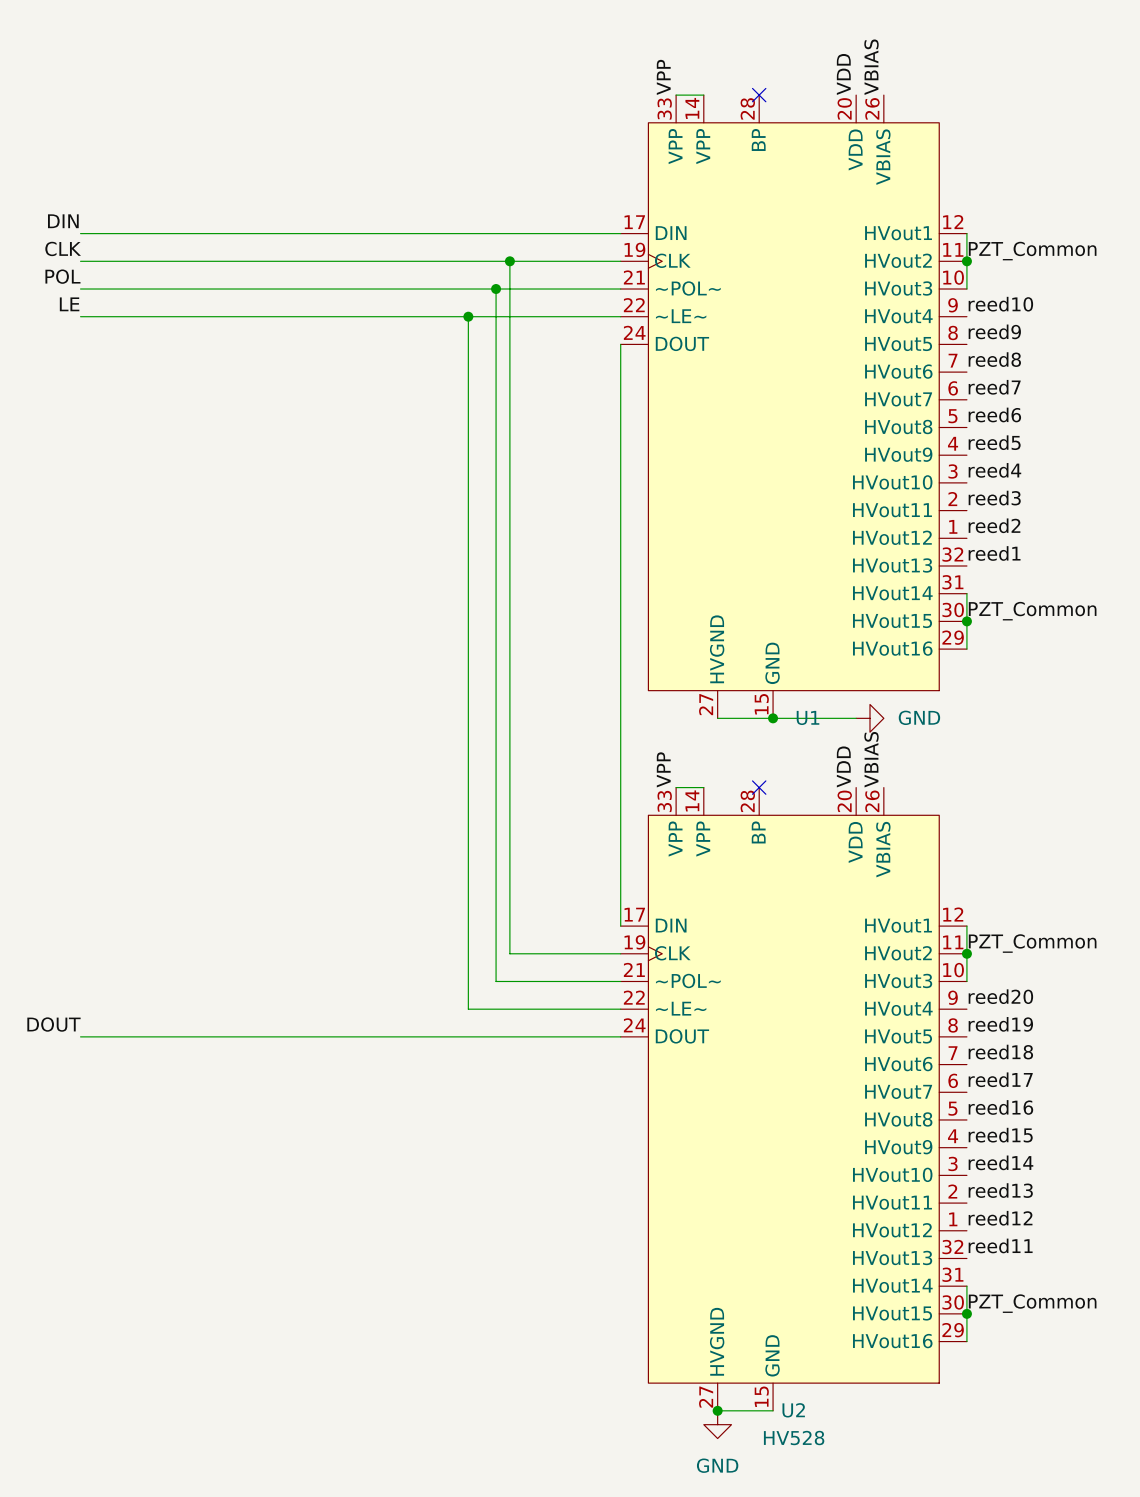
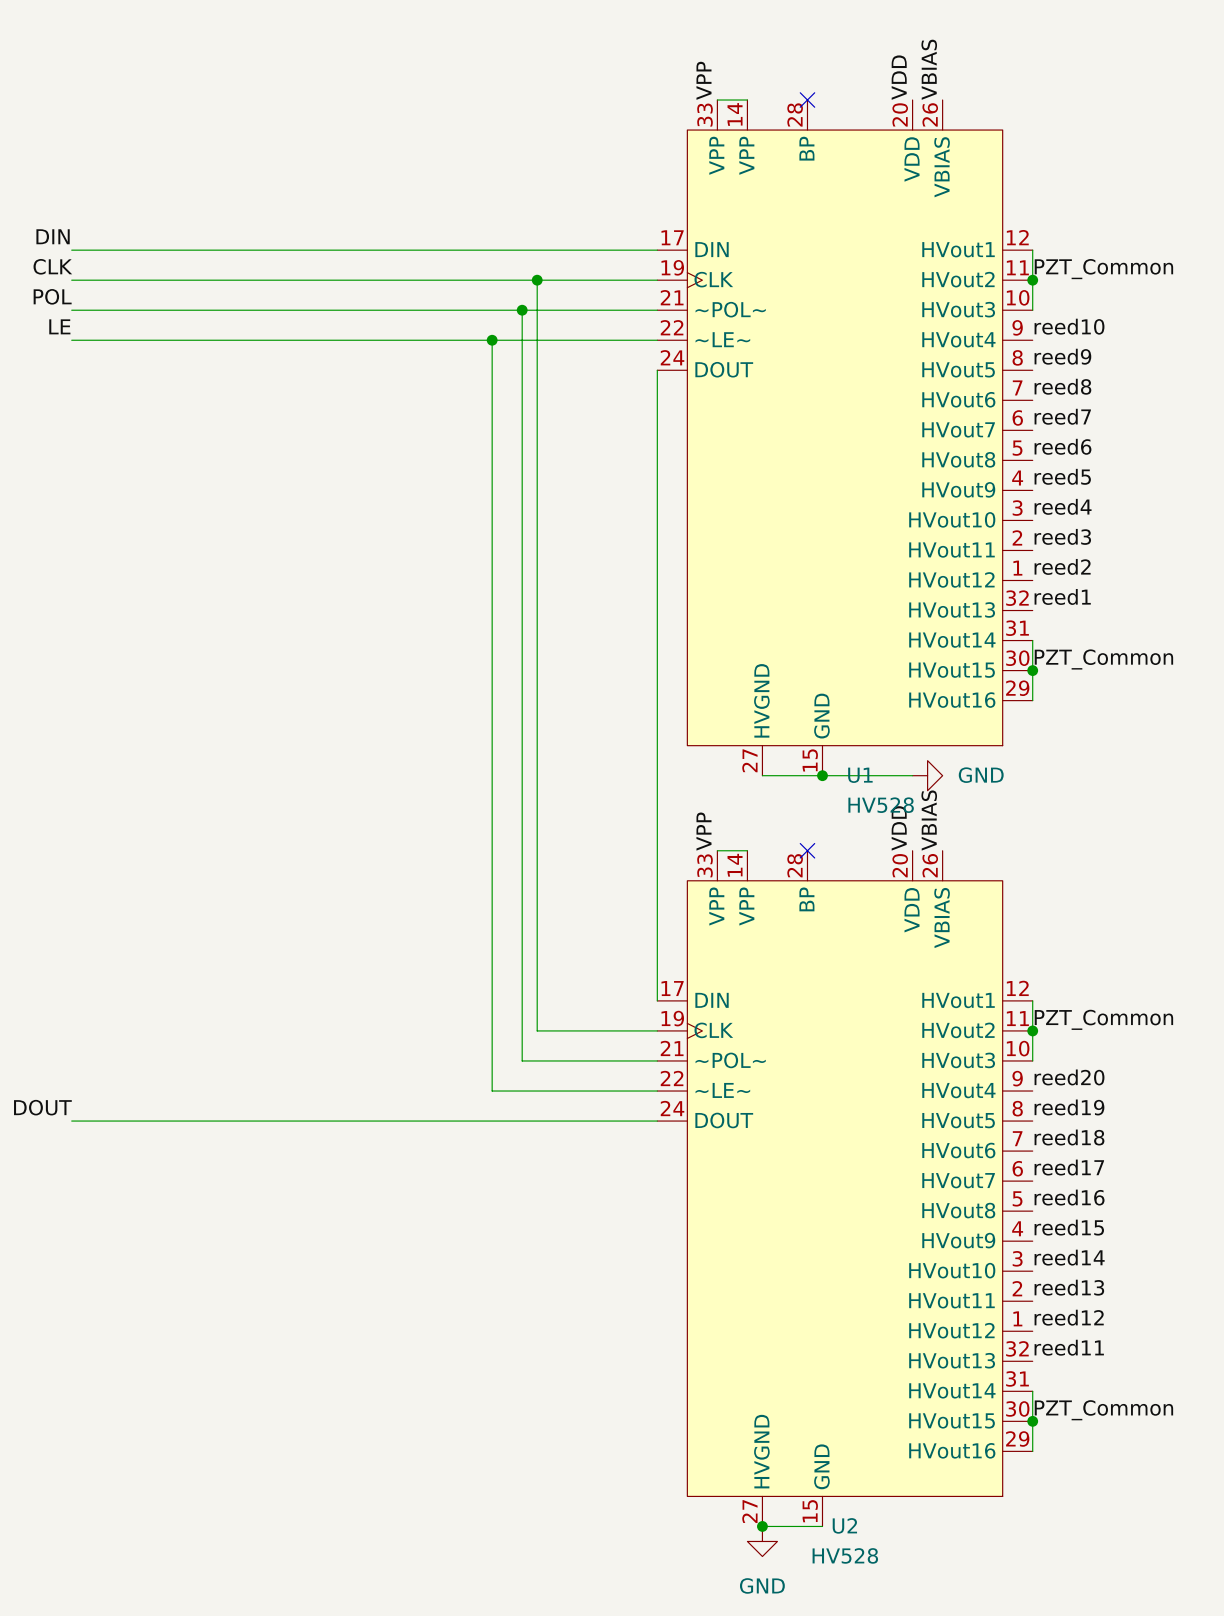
U1 value: none -> HV528 (881, 805)

